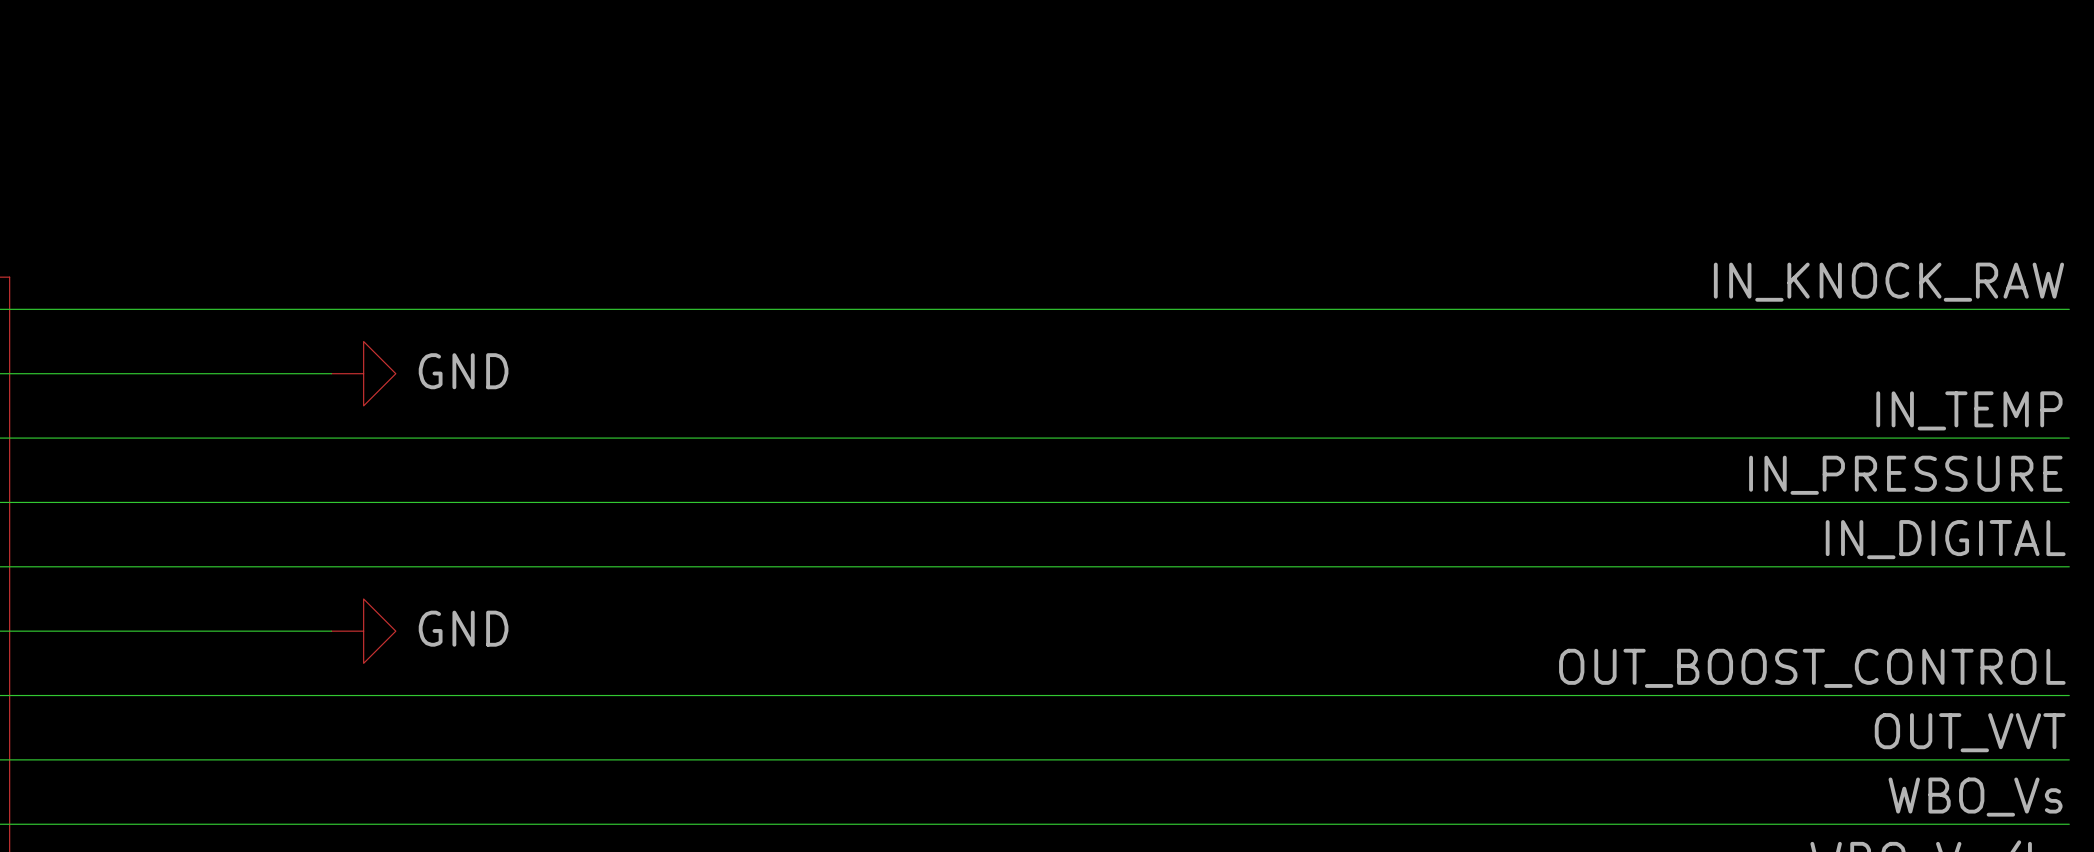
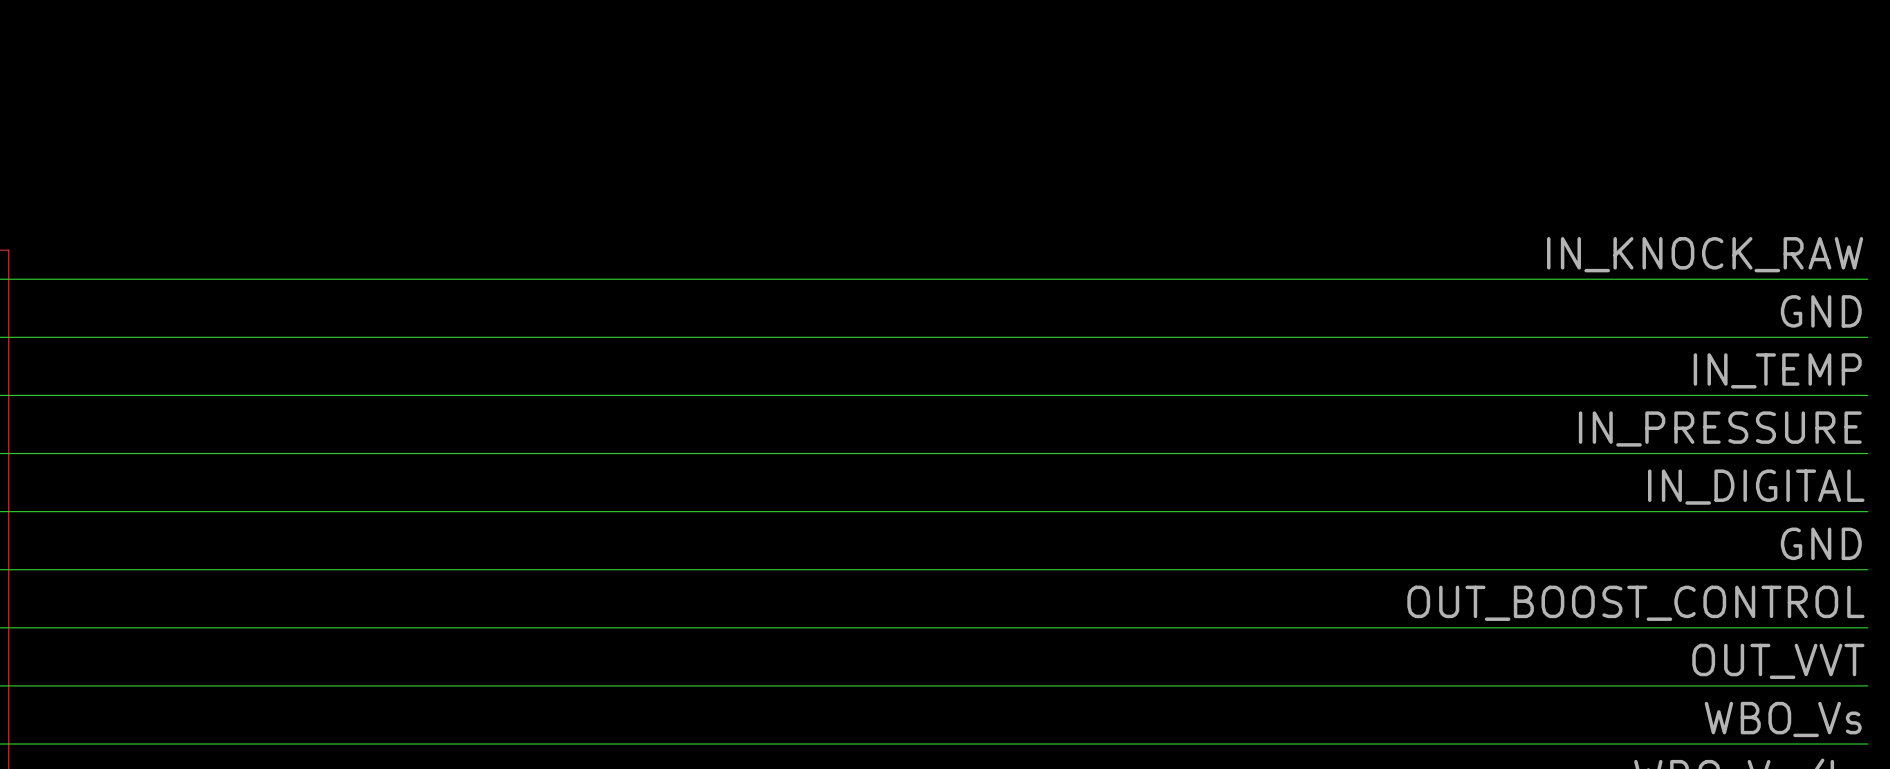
label: none -> GND (1821, 311)
wire: none -> (299, 337) (1867, 337)
power symbol: GND (363, 373) -> none
label: none -> GND (1821, 543)
wire: none -> (299, 569) (1867, 569)
power symbol: GND (363, 631) -> none

